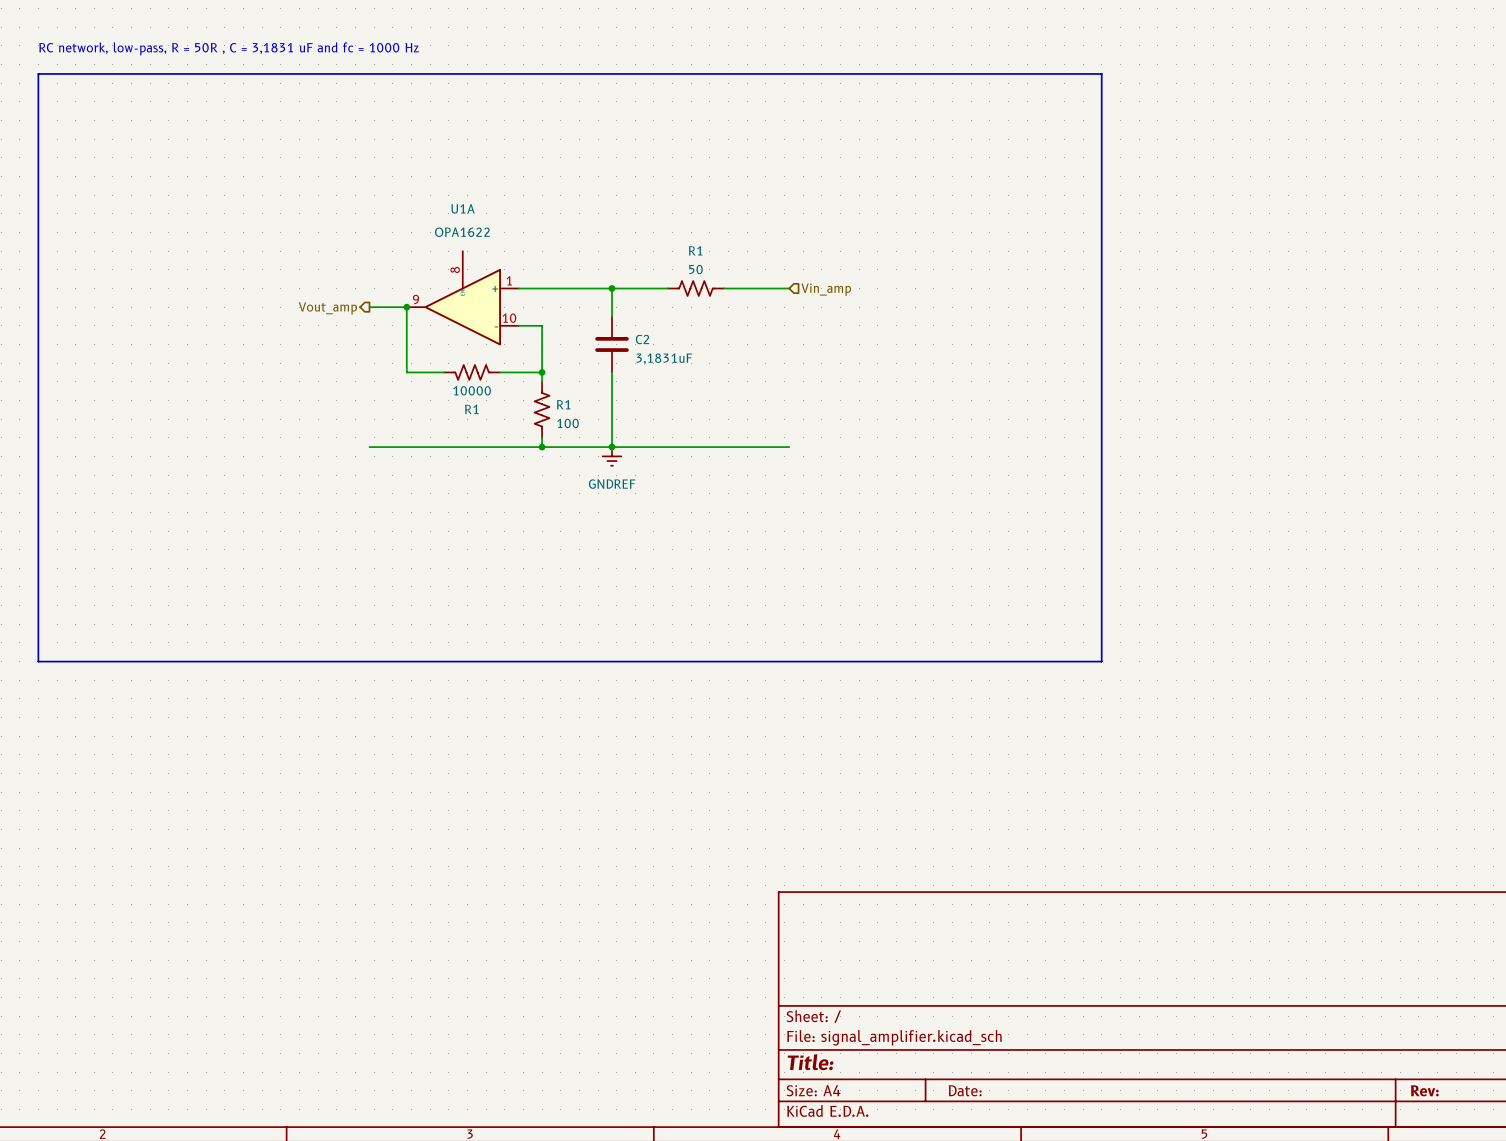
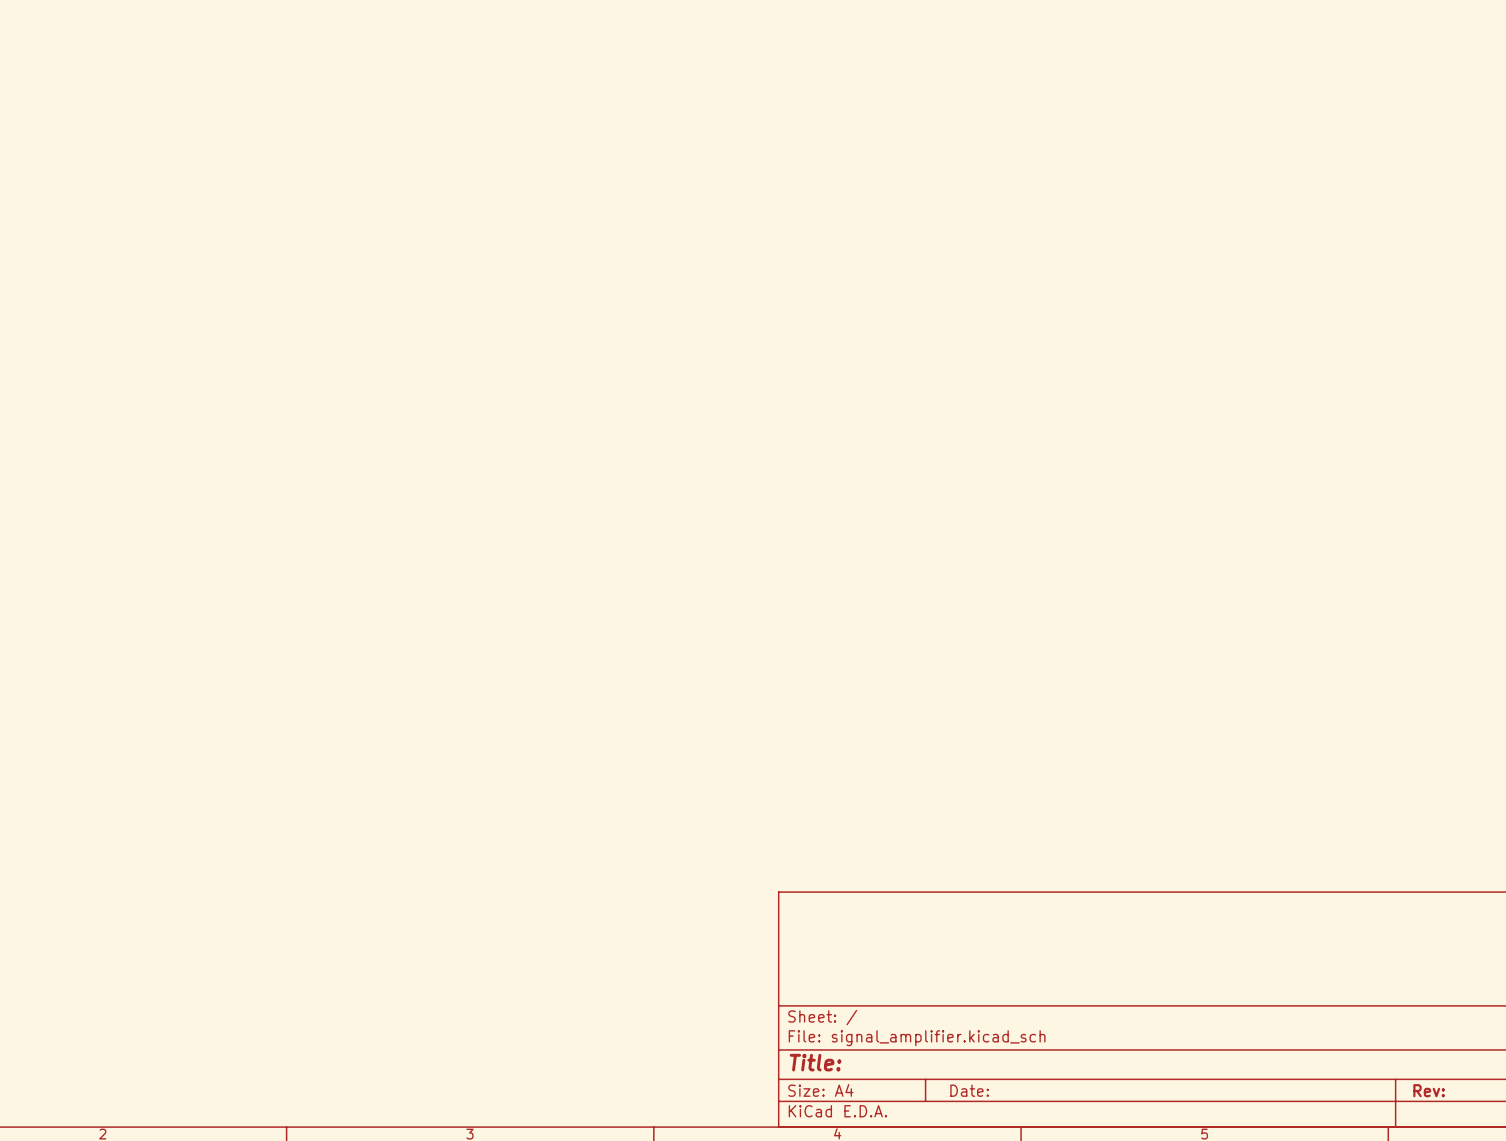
text: RC network, low-pass, R = 50R , C = 3,1831 uF and fc = 1000 Hz (229, 48) -> none
line: (38, 73) (1101, 73) (1101, 661) (38, 661) (38, 73) -> none
wire: (518, 288) (667, 288) -> none
wire: (612, 288) (612, 316) -> none
junction: (612, 288) -> none
R1: 50 (695, 288) -> none
wire: (723, 288) (789, 288) -> none
hierarchical label: Vin_amp (826, 289) -> none
U1A: OPA1622 (462, 298) -> none
wire: (369, 307) (406, 307) (406, 372) (444, 372) -> none
junction: (406, 307) -> none
hierarchical label: Vout_amp (327, 308) -> none
wire: (518, 325) (542, 325) (542, 381) -> none
C2: 3,1831uF (612, 344) -> none
R1: 10000 (472, 372) -> none
wire: (500, 372) (542, 372) -> none
junction: (542, 372) -> none
wire: (612, 372) (612, 447) -> none
R1: 100 (542, 409) -> none
wire: (542, 437) (542, 447) -> none
wire: (369, 447) (789, 447) -> none
junction: (542, 447) -> none
junction: (612, 447) -> none
power symbol: GNDREF (612, 456) -> none

